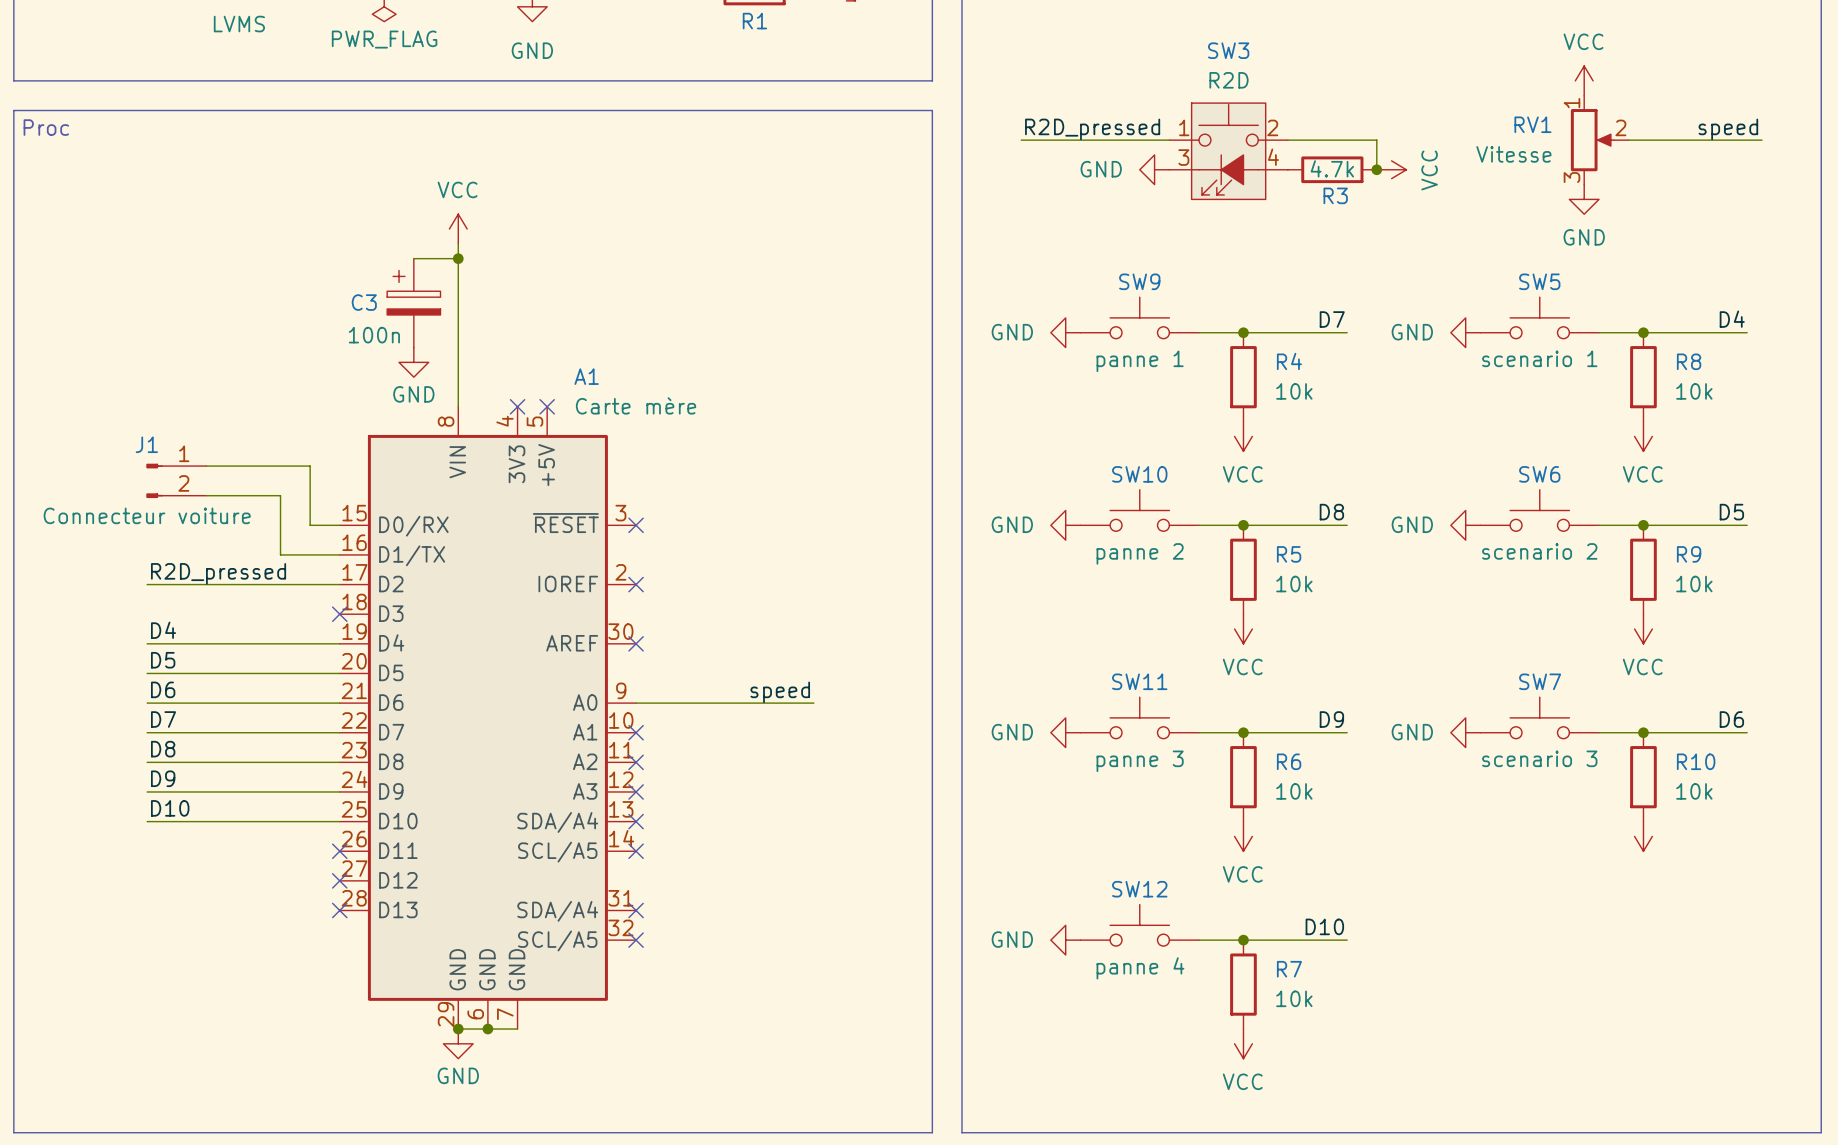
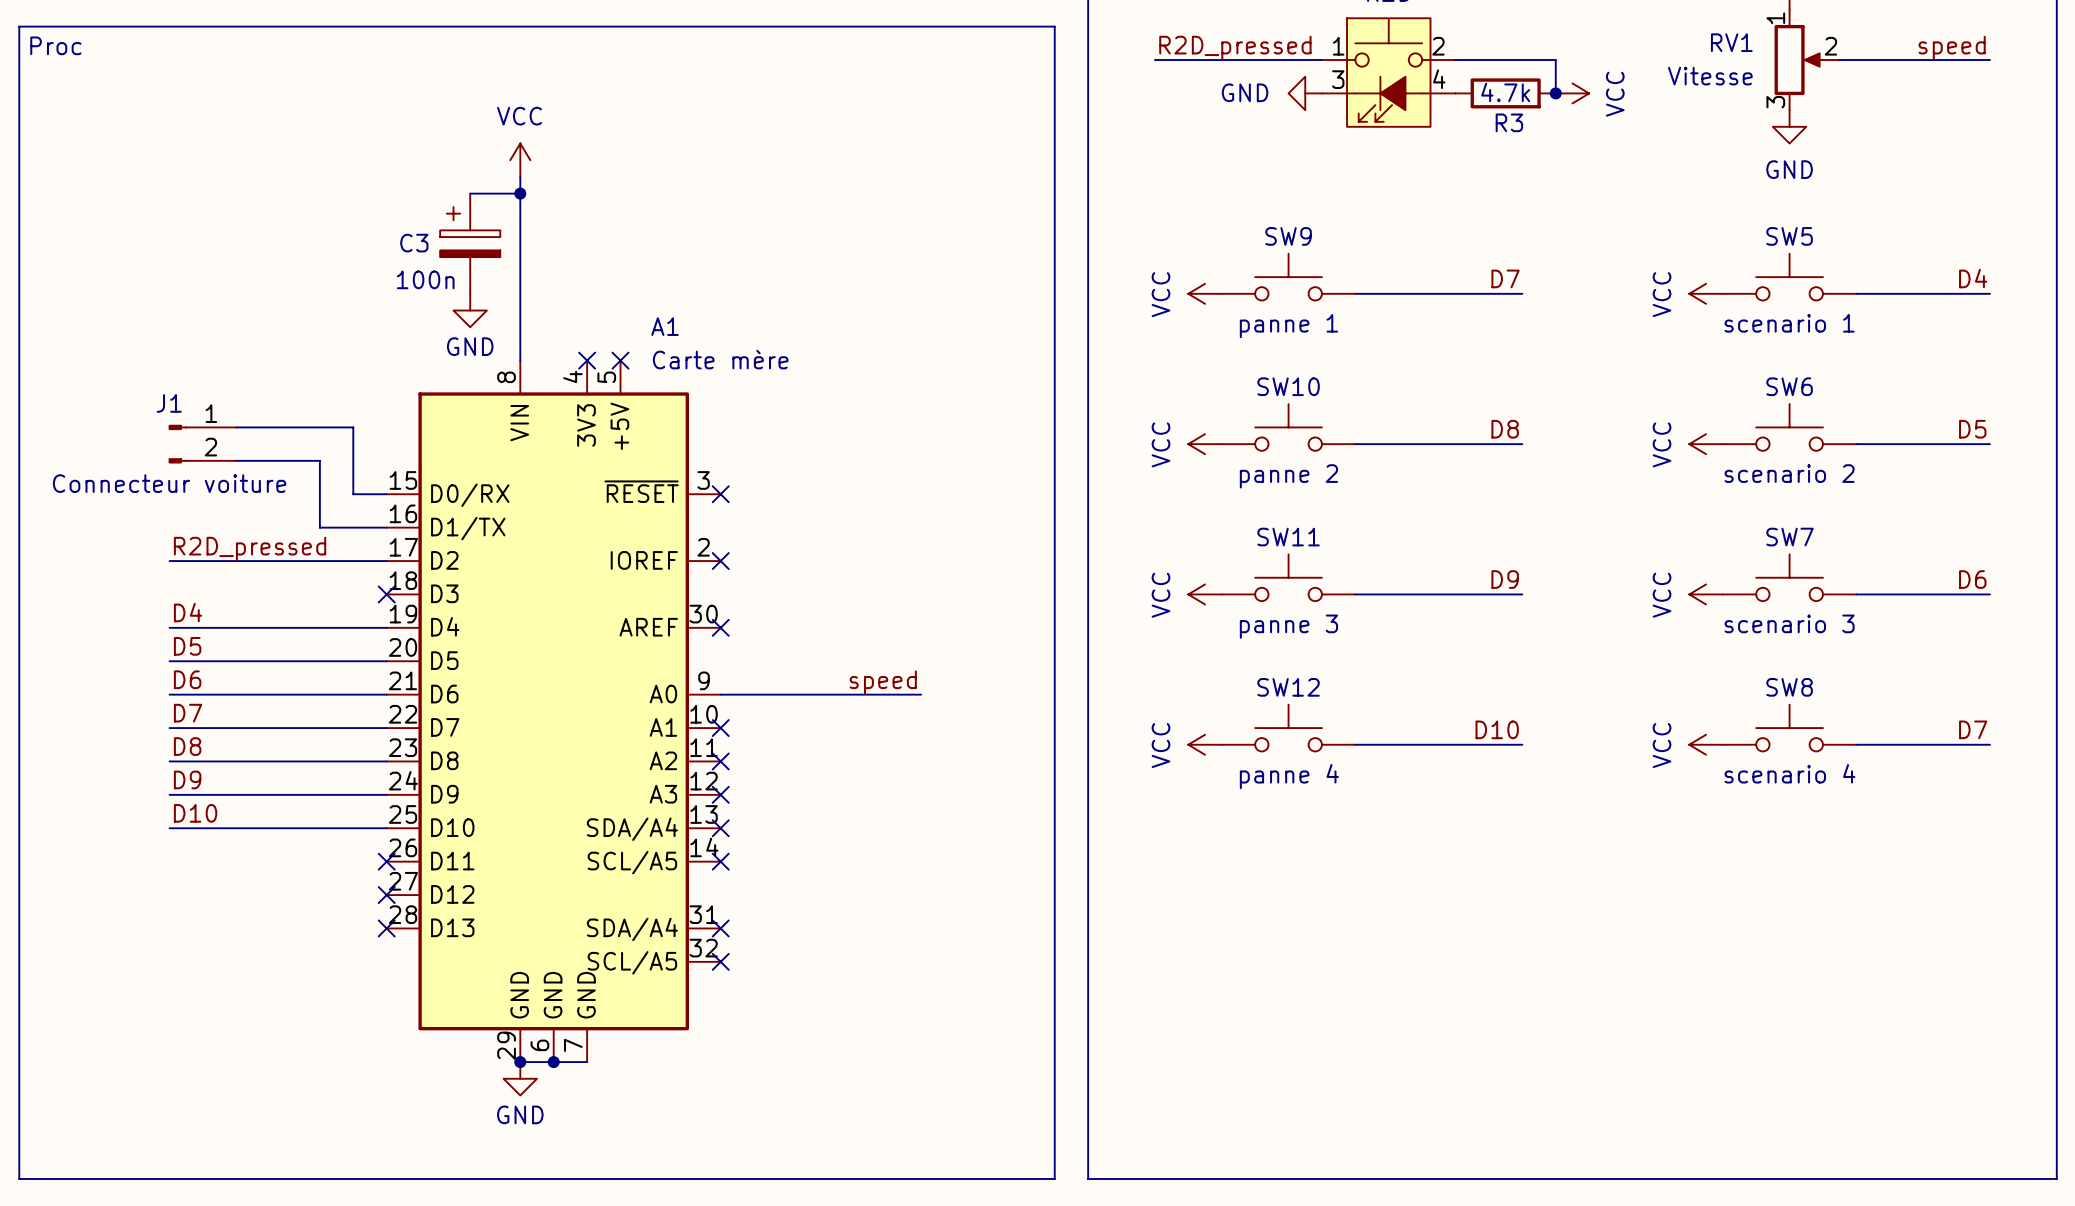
SW9 position: (1139, 317) -> (1288, 277)
SW5 position: (1539, 317) -> (1789, 277)
label position: D7 (1332, 319) -> D7 (1505, 278)
label position: D4 (1732, 319) -> D4 (1973, 278)
power symbol: GND (1065, 332) -> none
wire: (1199, 332) (1347, 332) -> (1355, 293) (1522, 293)
junction: (1243, 332) -> none
power symbol: GND (1465, 332) -> none
wire: (1599, 332) (1747, 332) -> none
junction: (1643, 332) -> none
power symbol: none -> VCC (1205, 293)
power symbol: none -> VCC (1706, 293)
wire: none -> (1856, 293) (1989, 293)
R4: 10k (1243, 377) -> none
R8: 10k (1643, 377) -> none
power symbol: VCC (1243, 436) -> none
power symbol: VCC (1643, 436) -> none
power symbol: none -> VCC (1205, 444)
power symbol: none -> VCC (1706, 444)
wire: none -> (1856, 444) (1989, 444)
SW10 position: (1139, 510) -> (1288, 427)
SW6 position: (1539, 510) -> (1789, 427)
label position: D8 (1331, 512) -> D8 (1505, 429)
label position: D5 (1731, 512) -> D5 (1972, 429)
power symbol: GND (1065, 525) -> none
wire: (1199, 525) (1347, 525) -> (1355, 444) (1522, 444)
junction: (1243, 525) -> none
power symbol: GND (1465, 525) -> none
wire: (1599, 525) (1747, 525) -> none
junction: (1643, 525) -> none
R5: 10k (1243, 569) -> none
R9: 10k (1643, 569) -> none
power symbol: none -> VCC (1205, 594)
wire: none -> (1355, 594) (1522, 594)
power symbol: none -> VCC (1706, 594)
wire: none -> (1856, 594) (1989, 594)
power symbol: VCC (1243, 629) -> none
power symbol: VCC (1643, 629) -> none
SW11 position: (1139, 717) -> (1288, 577)
SW7 position: (1539, 717) -> (1789, 577)
label position: D9 (1331, 719) -> D9 (1505, 579)
label position: D6 (1731, 719) -> D6 (1972, 579)
power symbol: GND (1065, 732) -> none
wire: (1199, 732) (1347, 732) -> (1355, 744) (1522, 744)
junction: (1243, 732) -> none
power symbol: GND (1465, 732) -> none
SW8: none -> scenario 4 (1789, 728)
wire: (1599, 732) (1747, 732) -> none
junction: (1643, 732) -> none
label: none -> D7 (1973, 729)
power symbol: none -> VCC (1205, 744)
power symbol: none -> VCC (1706, 744)
wire: none -> (1856, 744) (1989, 744)
R6: 10k (1243, 777) -> none
R10: 10k (1643, 777) -> none
power symbol: VCC (1243, 836) -> none
power symbol: (1643, 836) -> none
SW12 position: (1139, 925) -> (1288, 728)
label position: D10 (1324, 926) -> D10 (1497, 729)
power symbol: GND (1065, 940) -> none
wire: (1199, 940) (1347, 940) -> none
junction: (1243, 940) -> none
R7: 10k (1243, 984) -> none
power symbol: VCC (1243, 1043) -> none

